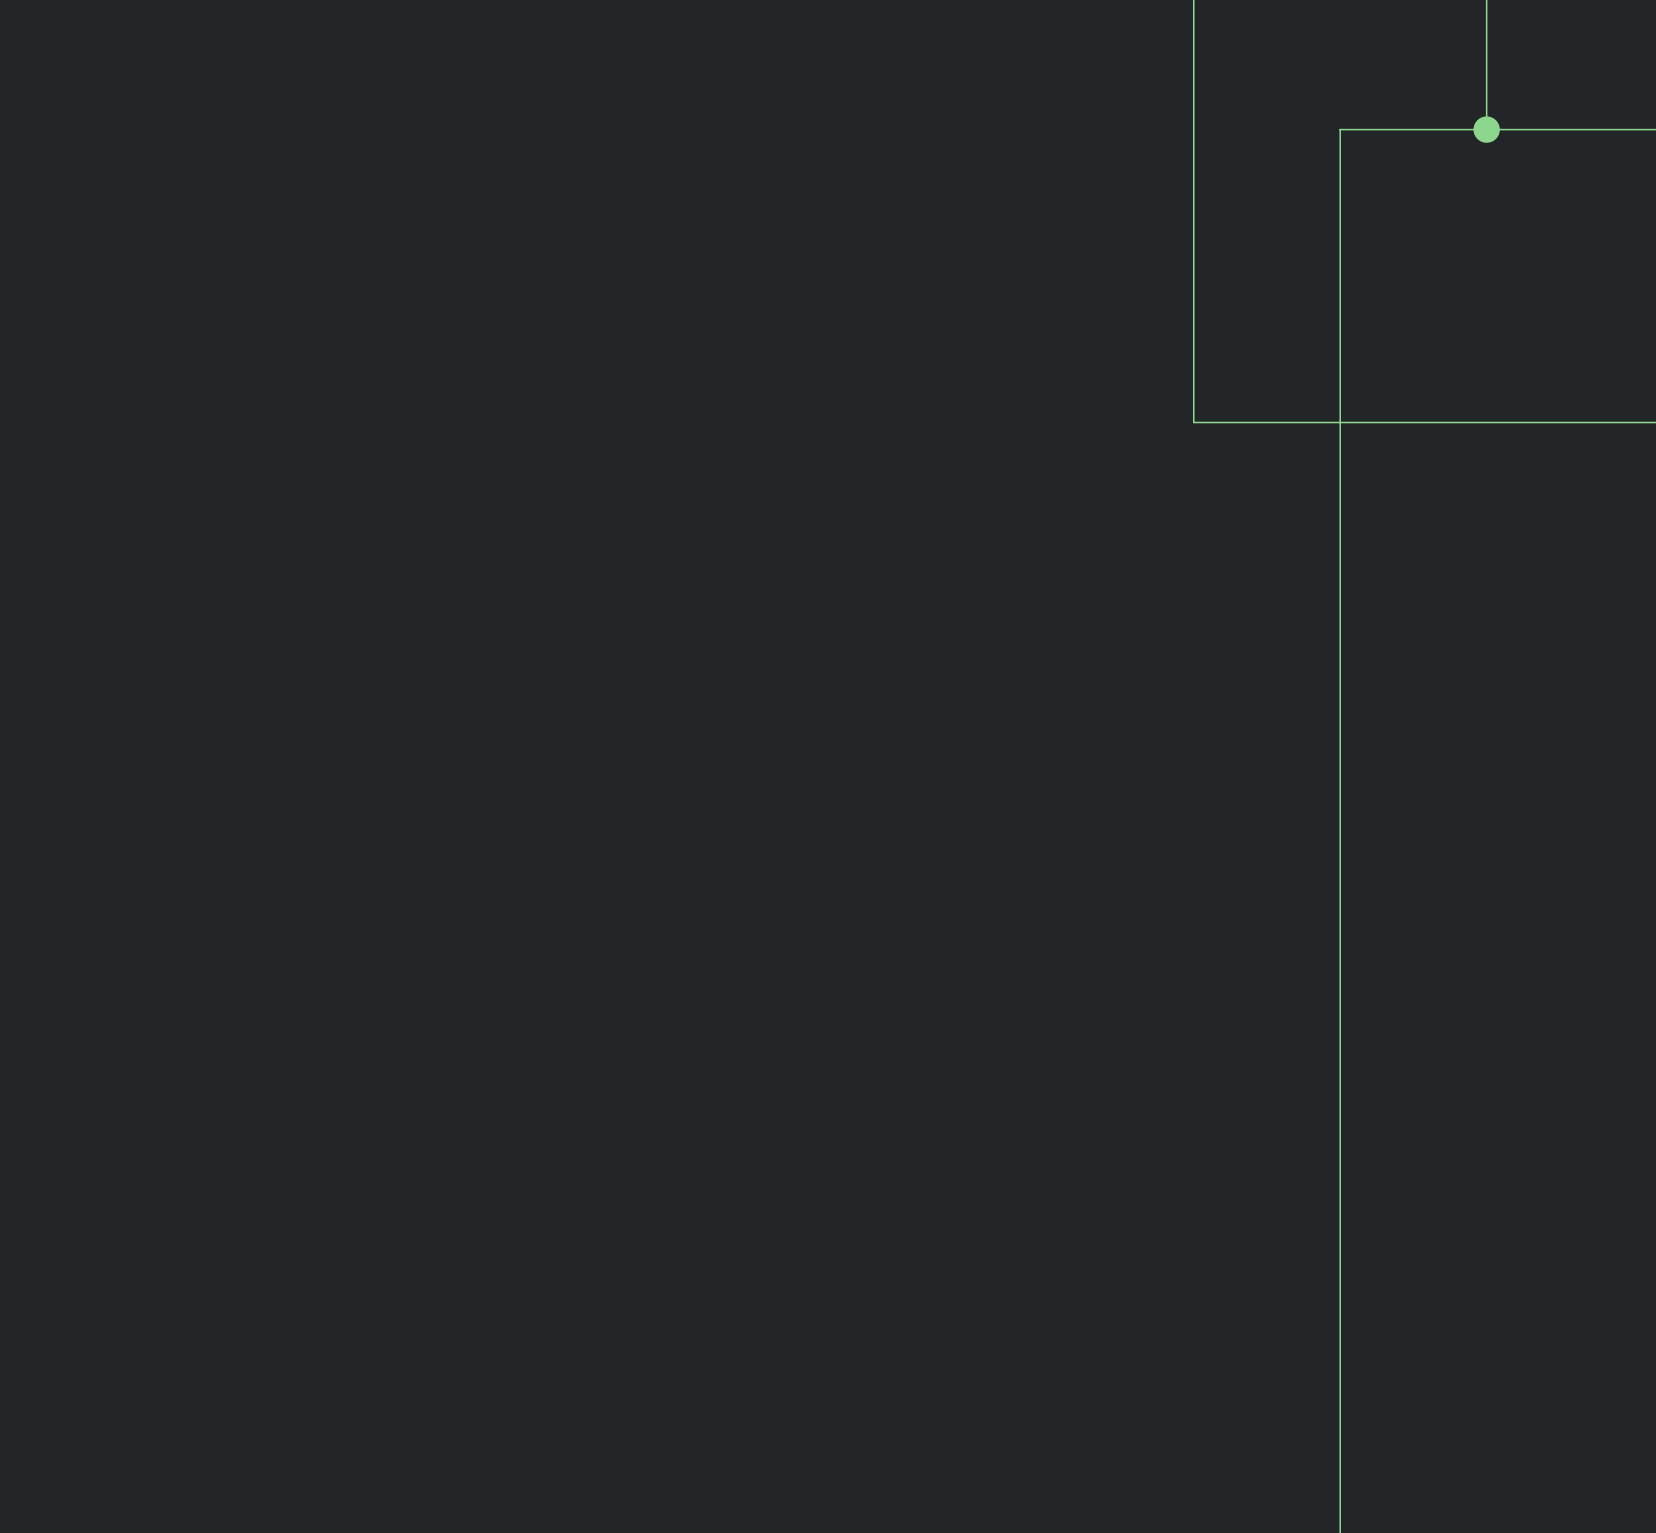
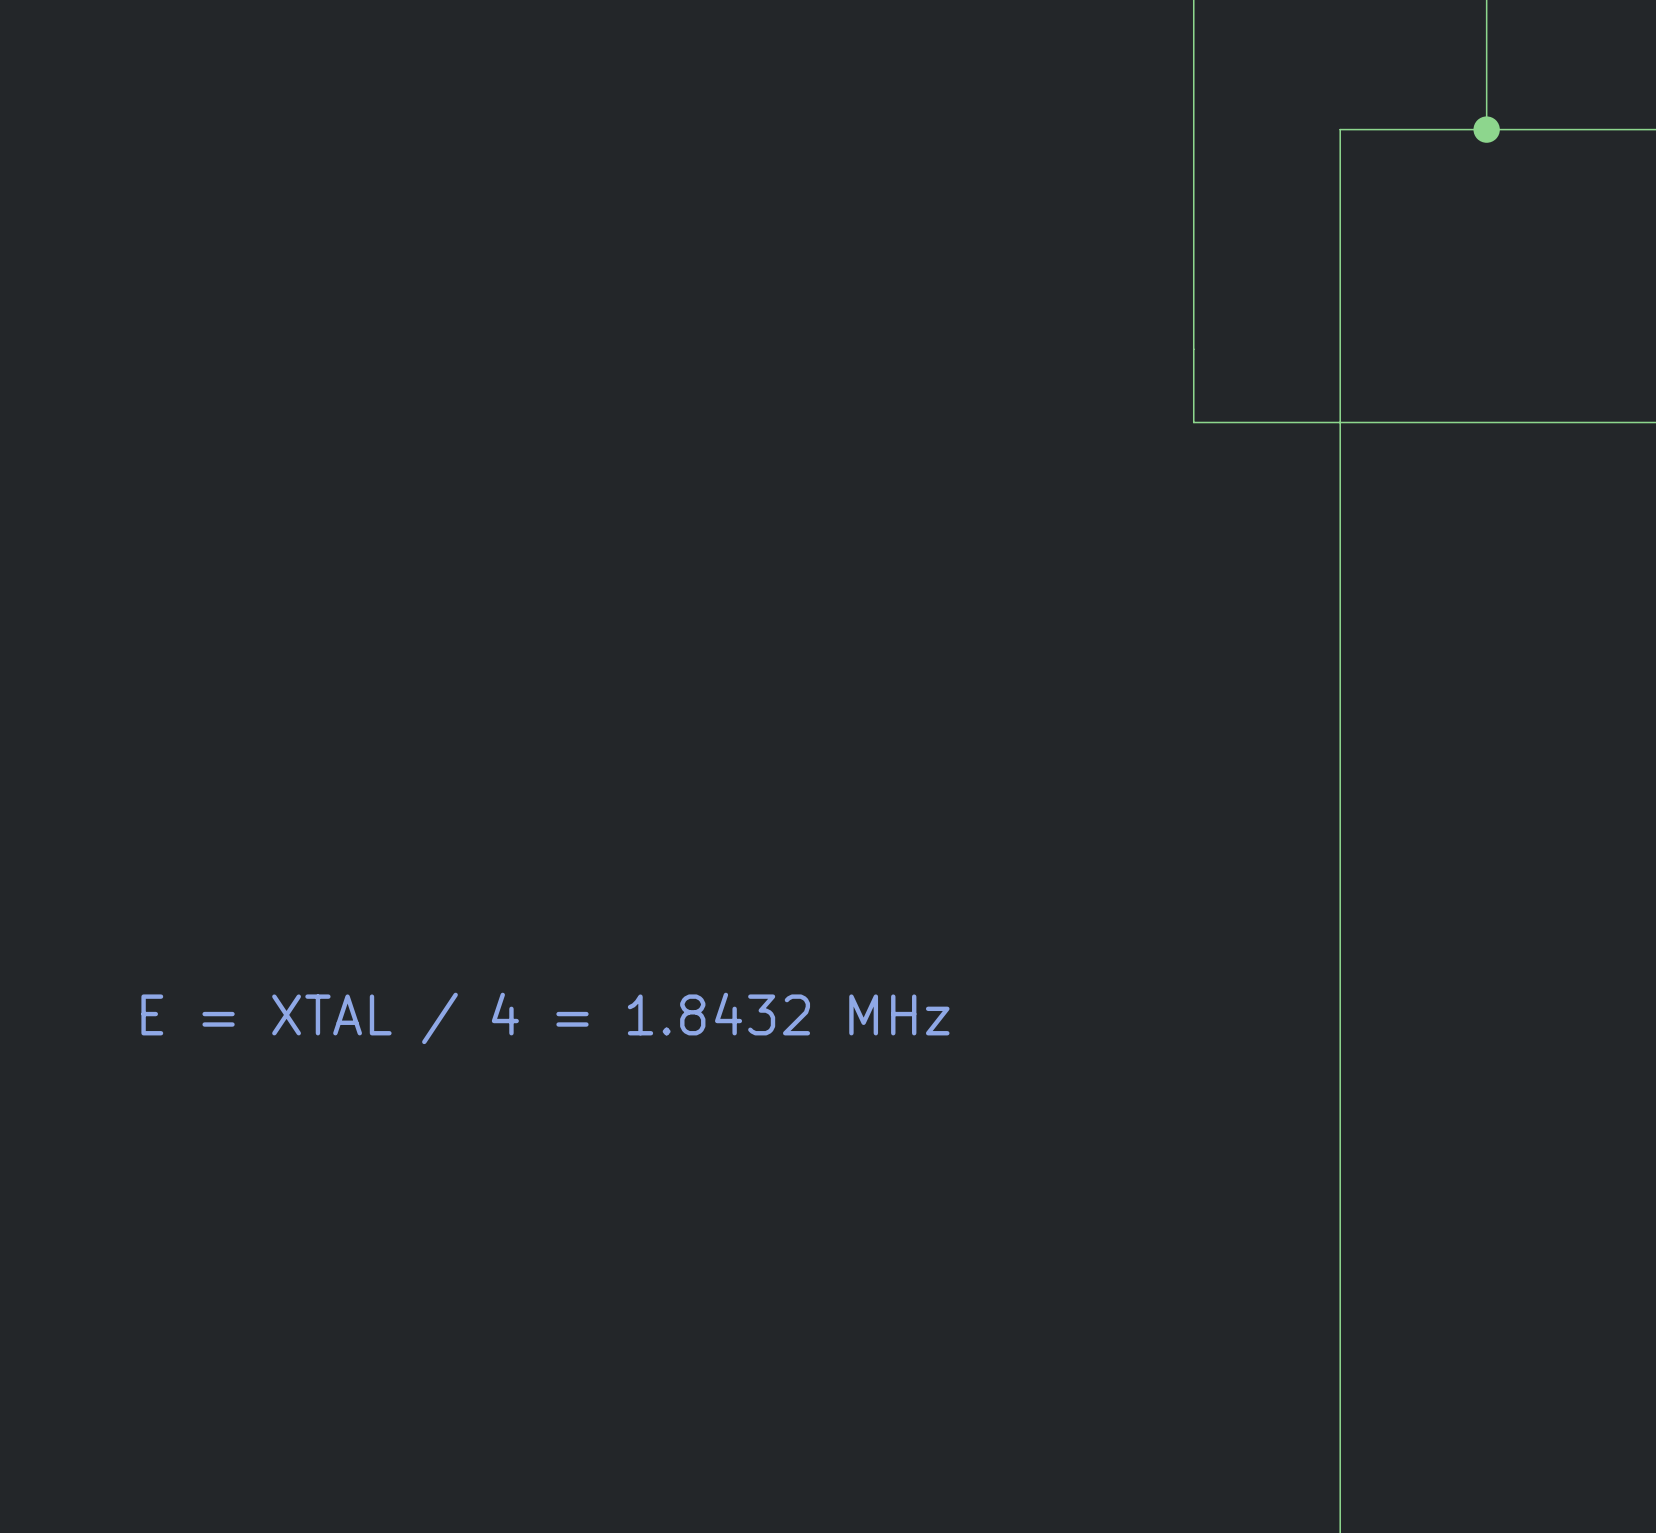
text: none -> E = XTAL / 4 = 1.8432 MHz (545, 1018)

